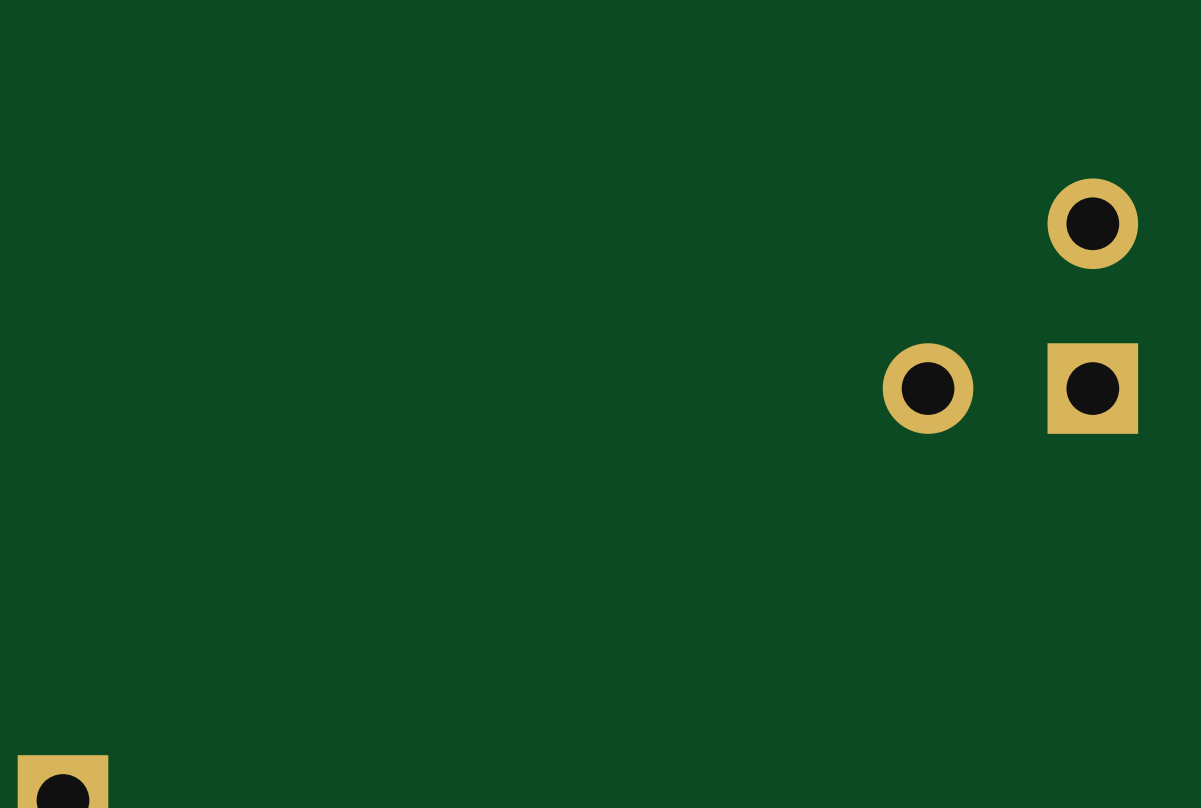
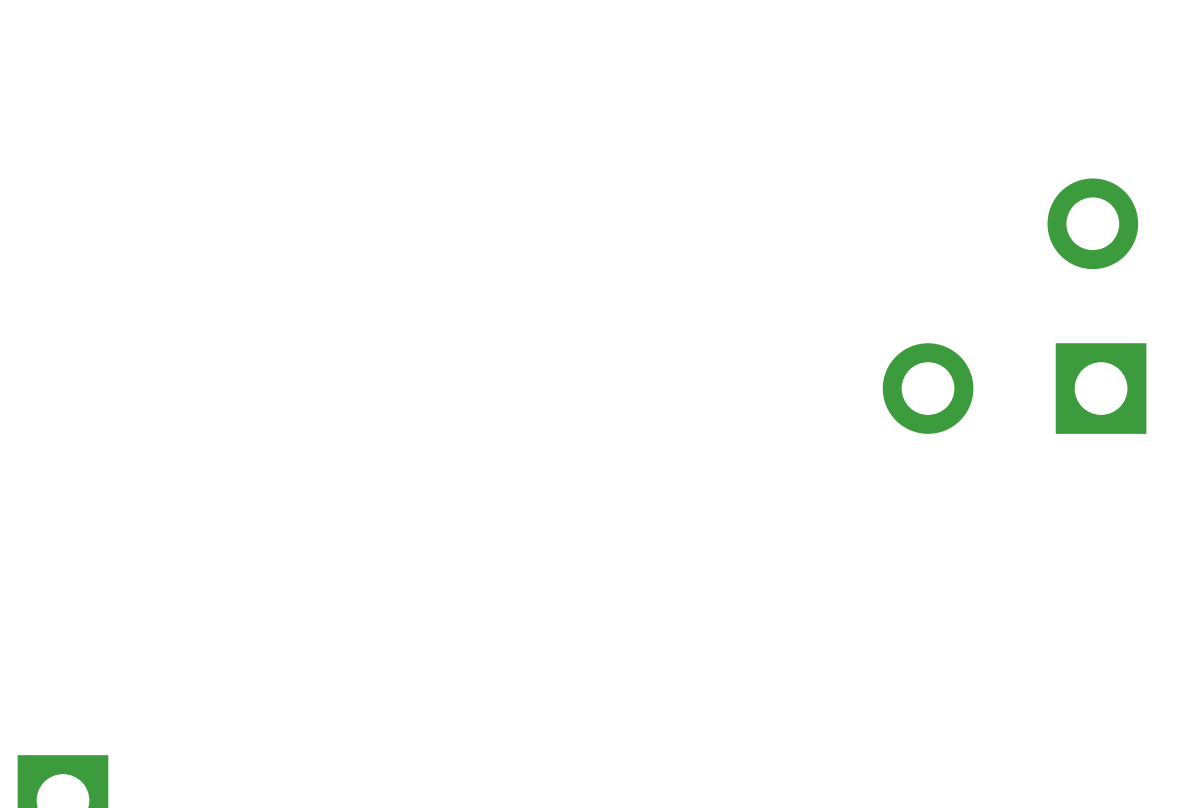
part footprint: [882, 178, 1139, 434] -> [882, 178, 1147, 434]

